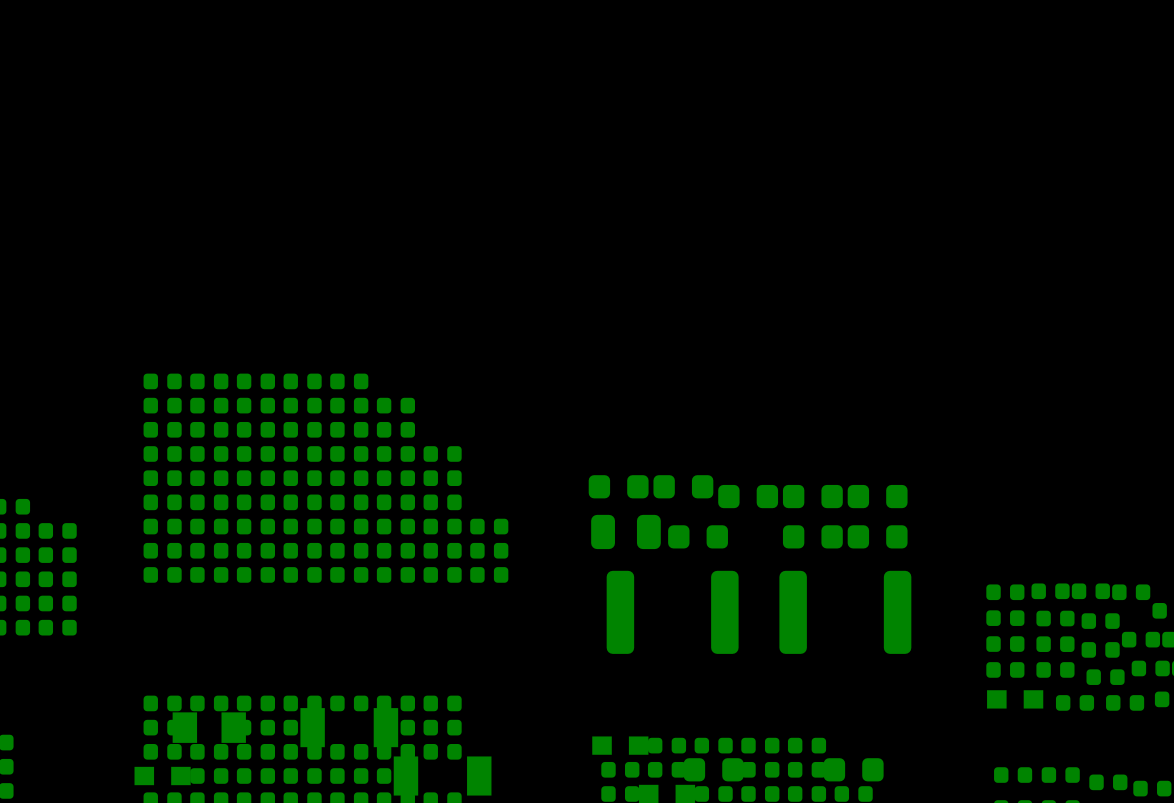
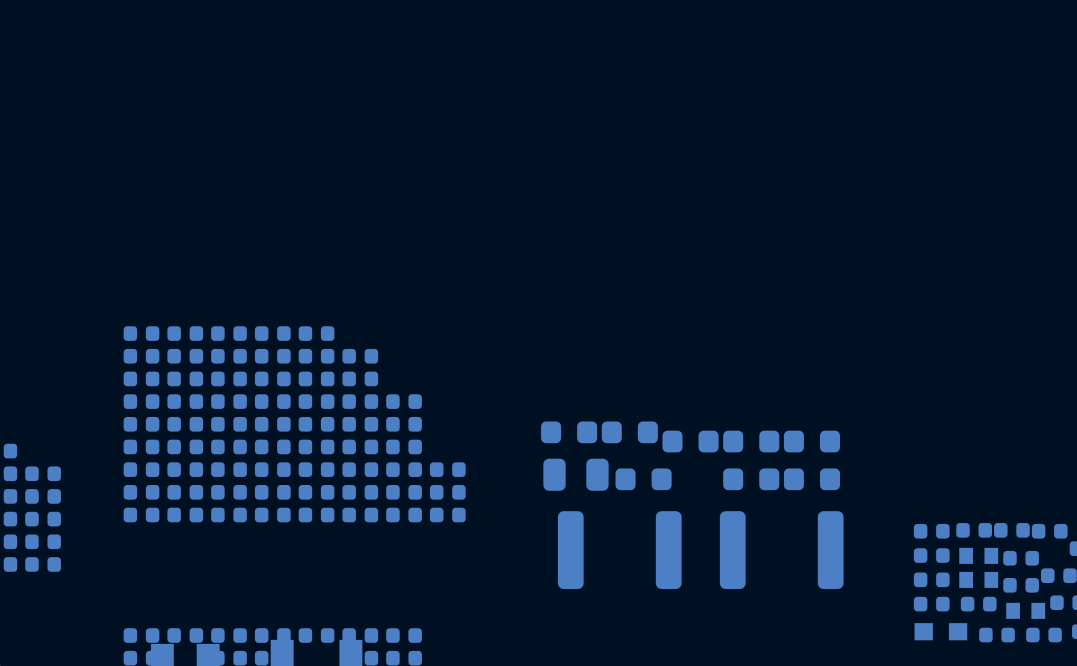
part footprint: [1036, 610, 1075, 627] -> [959, 547, 999, 564]
part footprint: [1036, 636, 1075, 652] -> [959, 571, 999, 588]
part footprint: [1086, 669, 1125, 685] -> [1006, 602, 1046, 619]

